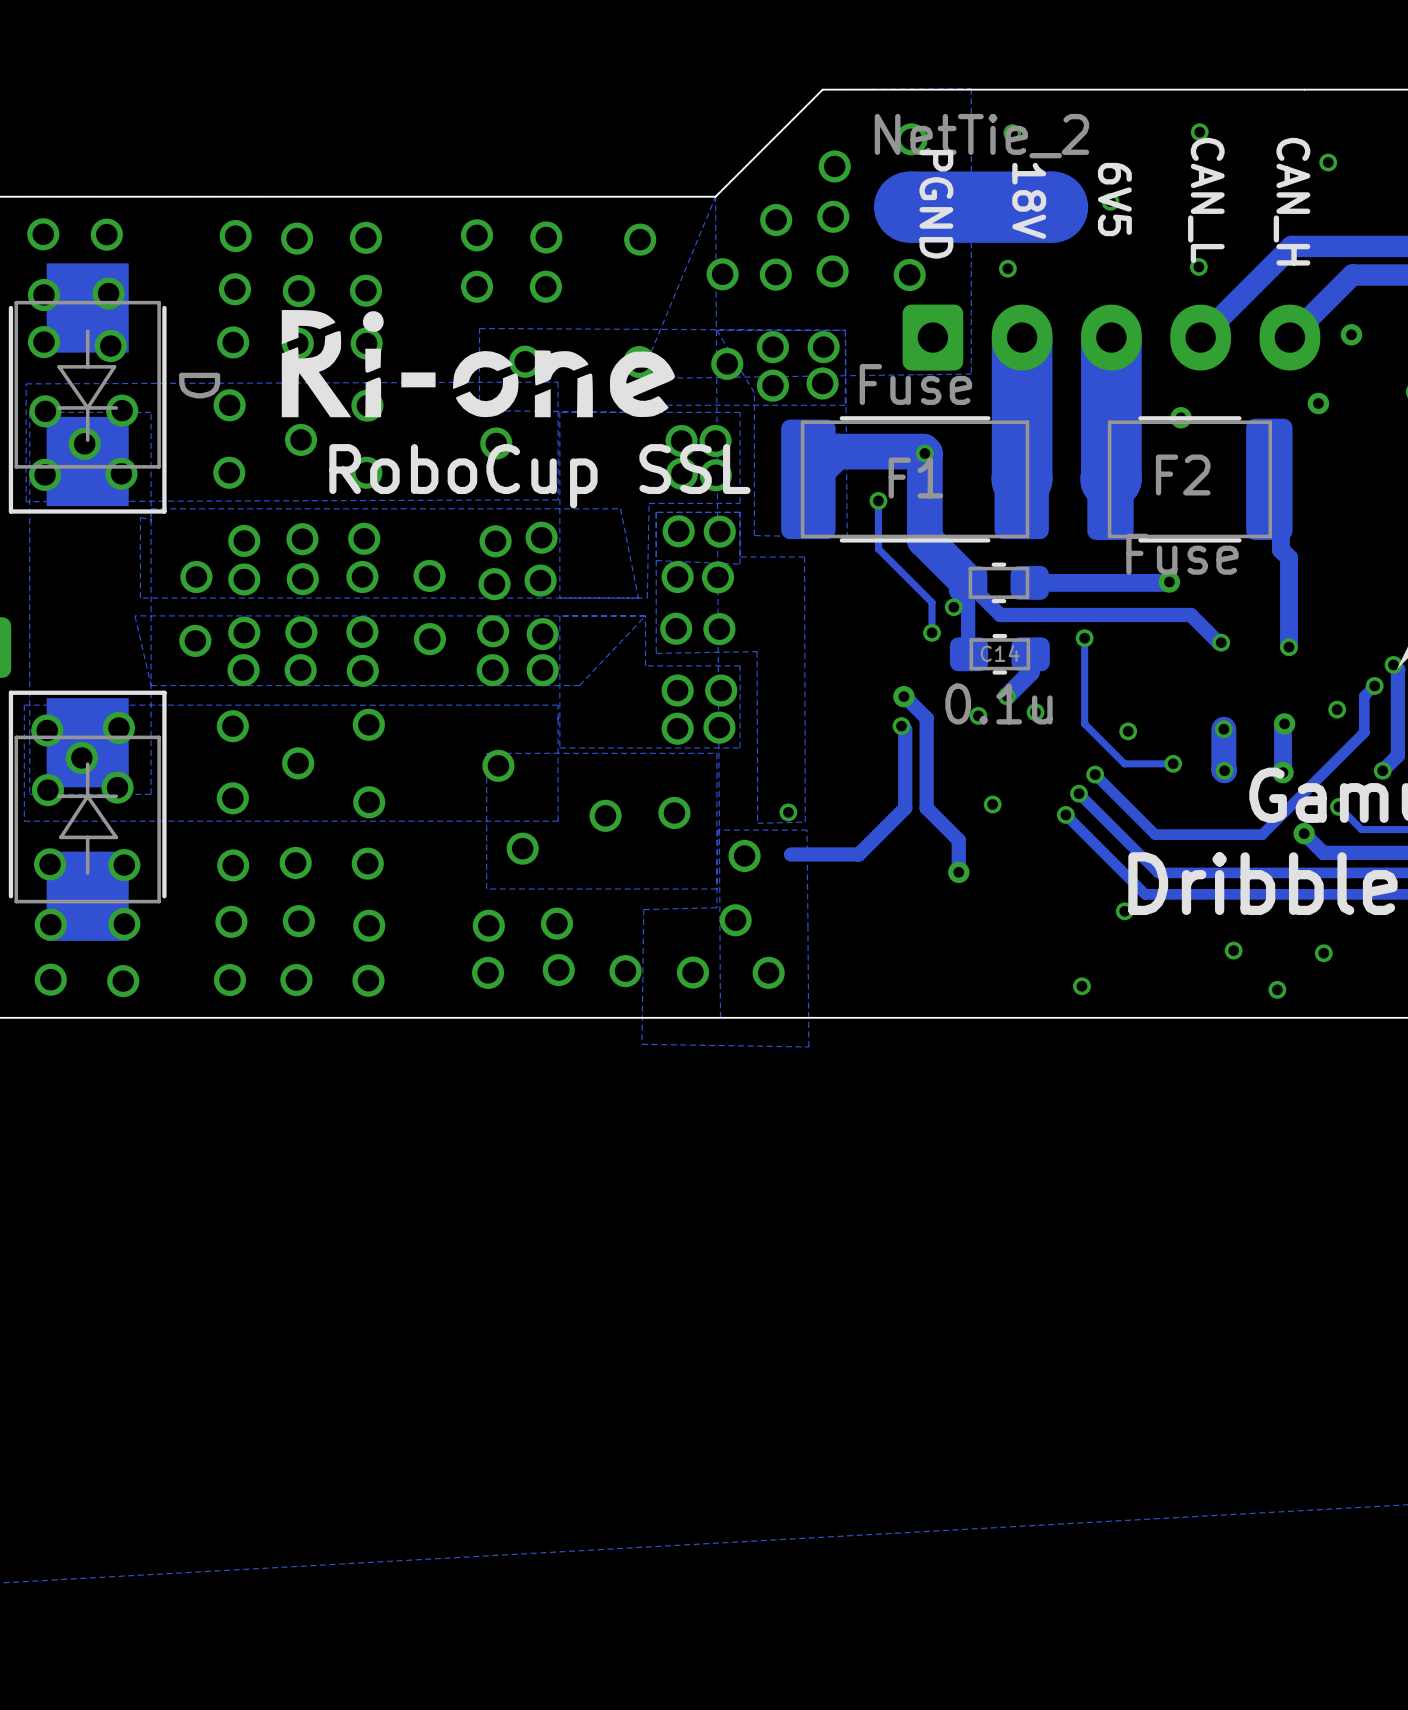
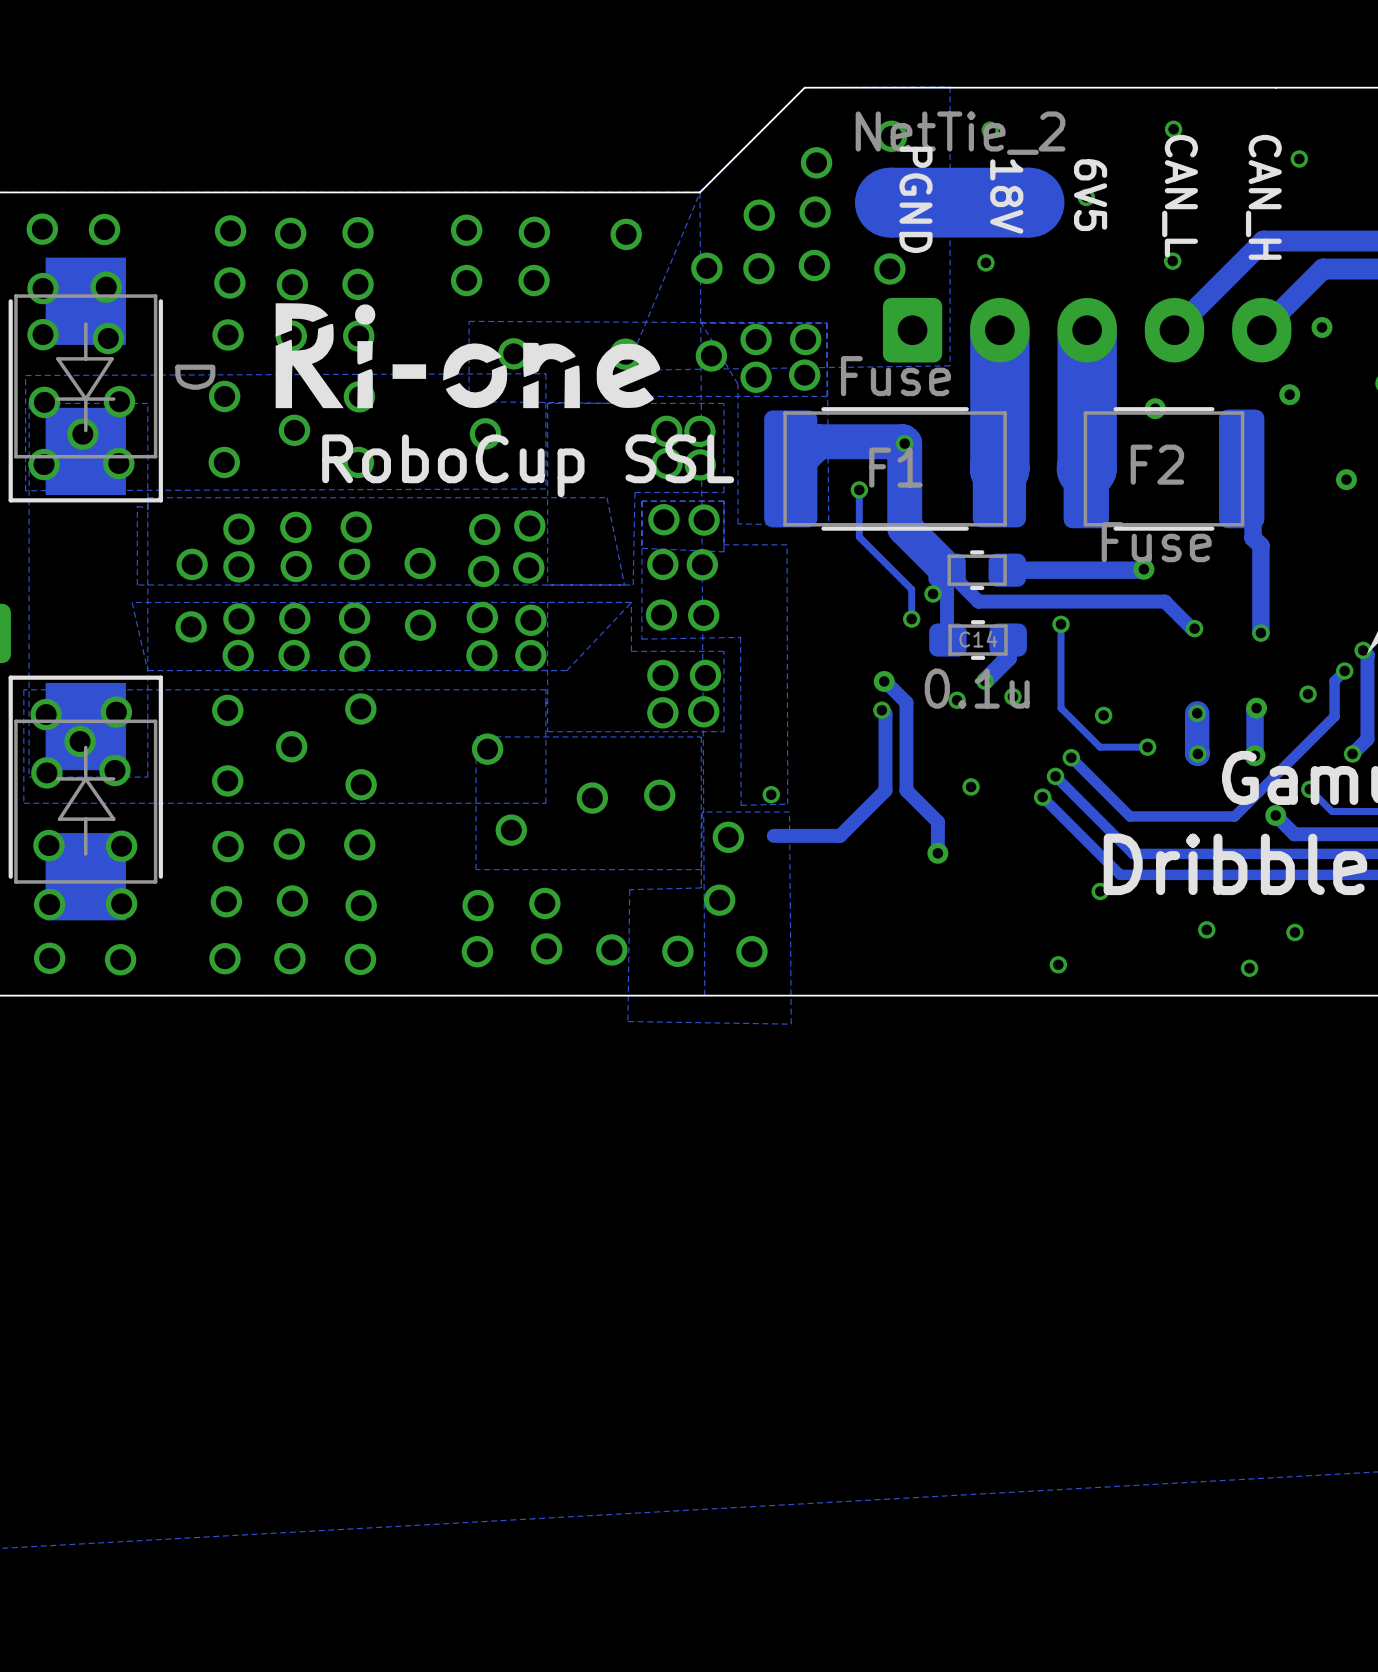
via: none -> (1346, 479)

